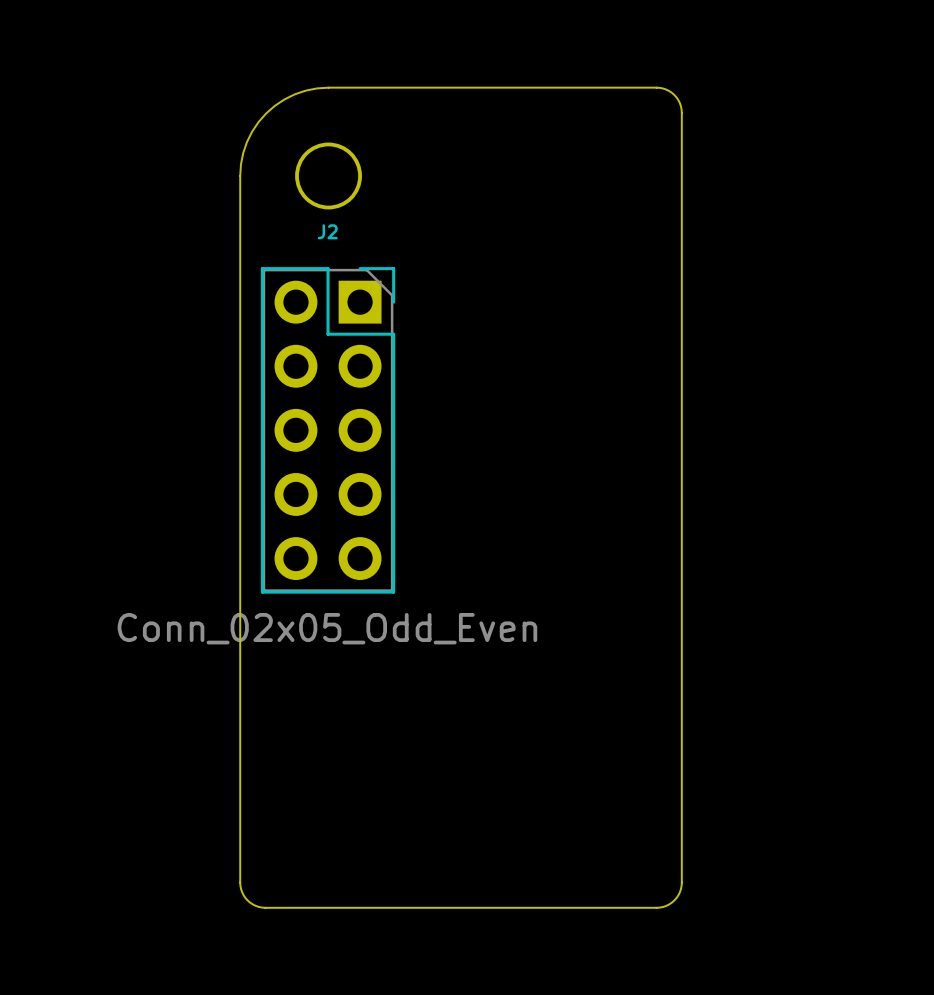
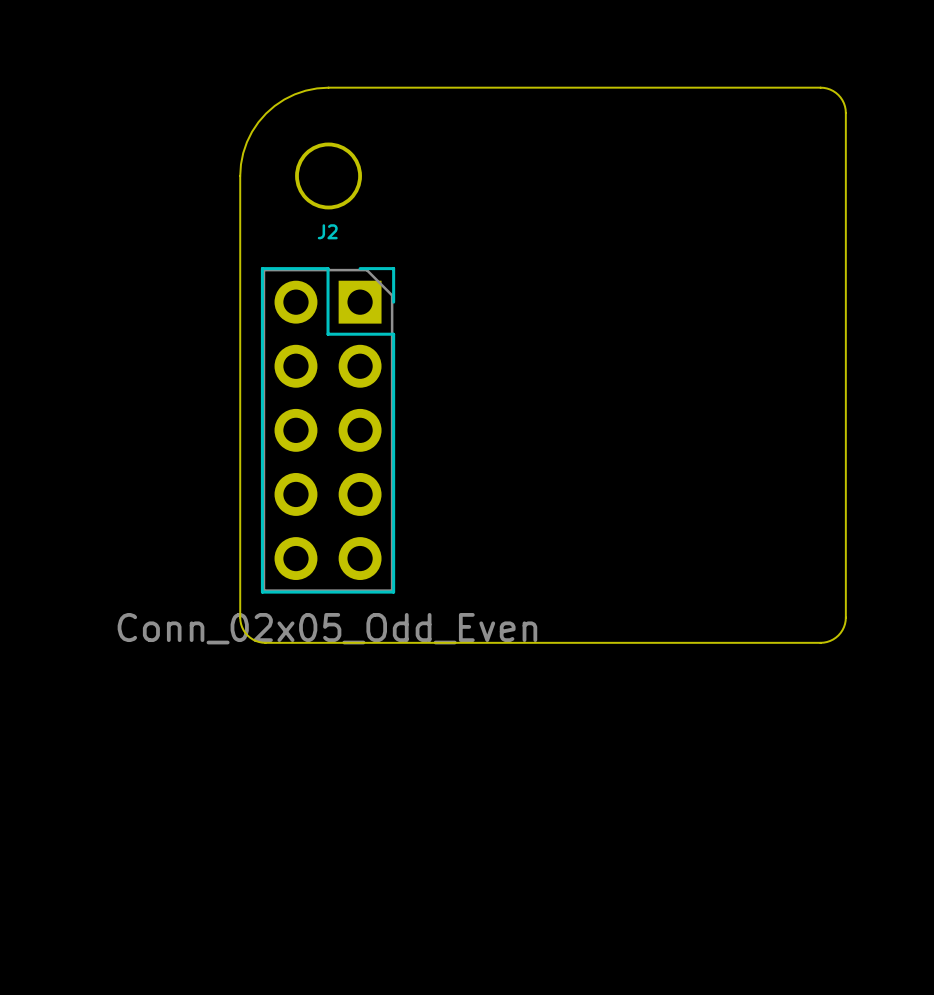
board edge: (656, 87) (666, 89) (674, 95) (679, 103) (681, 112) (681, 882) (676, 897) (666, 905) (656, 907) (265, 907) (252, 904) (243, 895) (240, 882) (240, 617) -> (656, 87) (823, 87) (838, 95) (844, 106) (845, 617) (840, 632) (830, 640) (820, 642) (265, 642) (255, 640) (247, 635) (242, 627) (240, 617)

